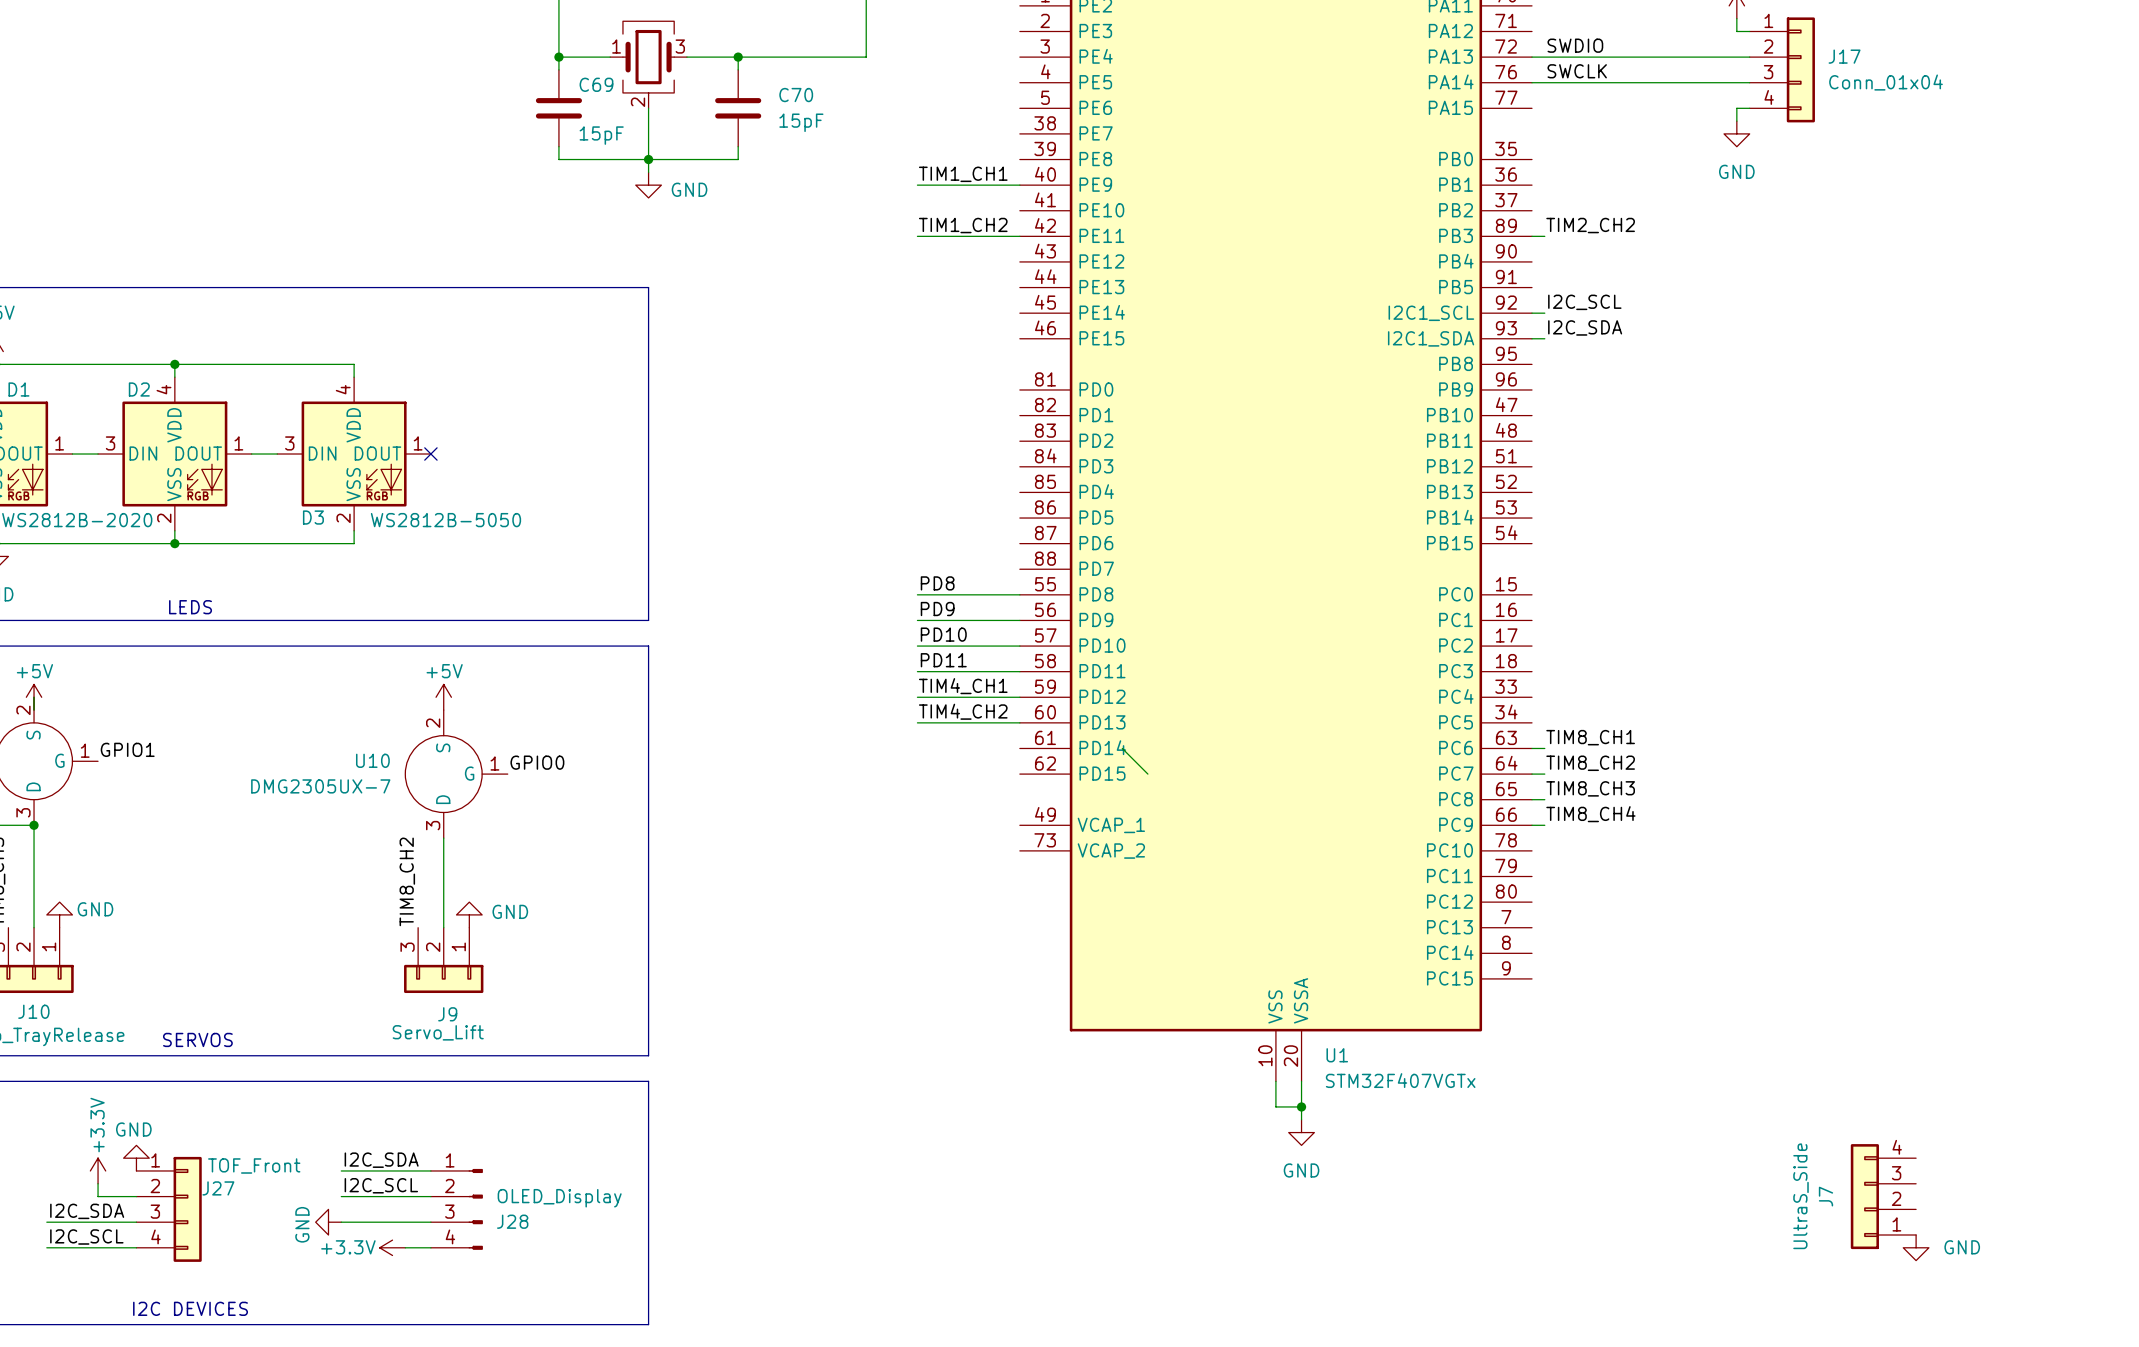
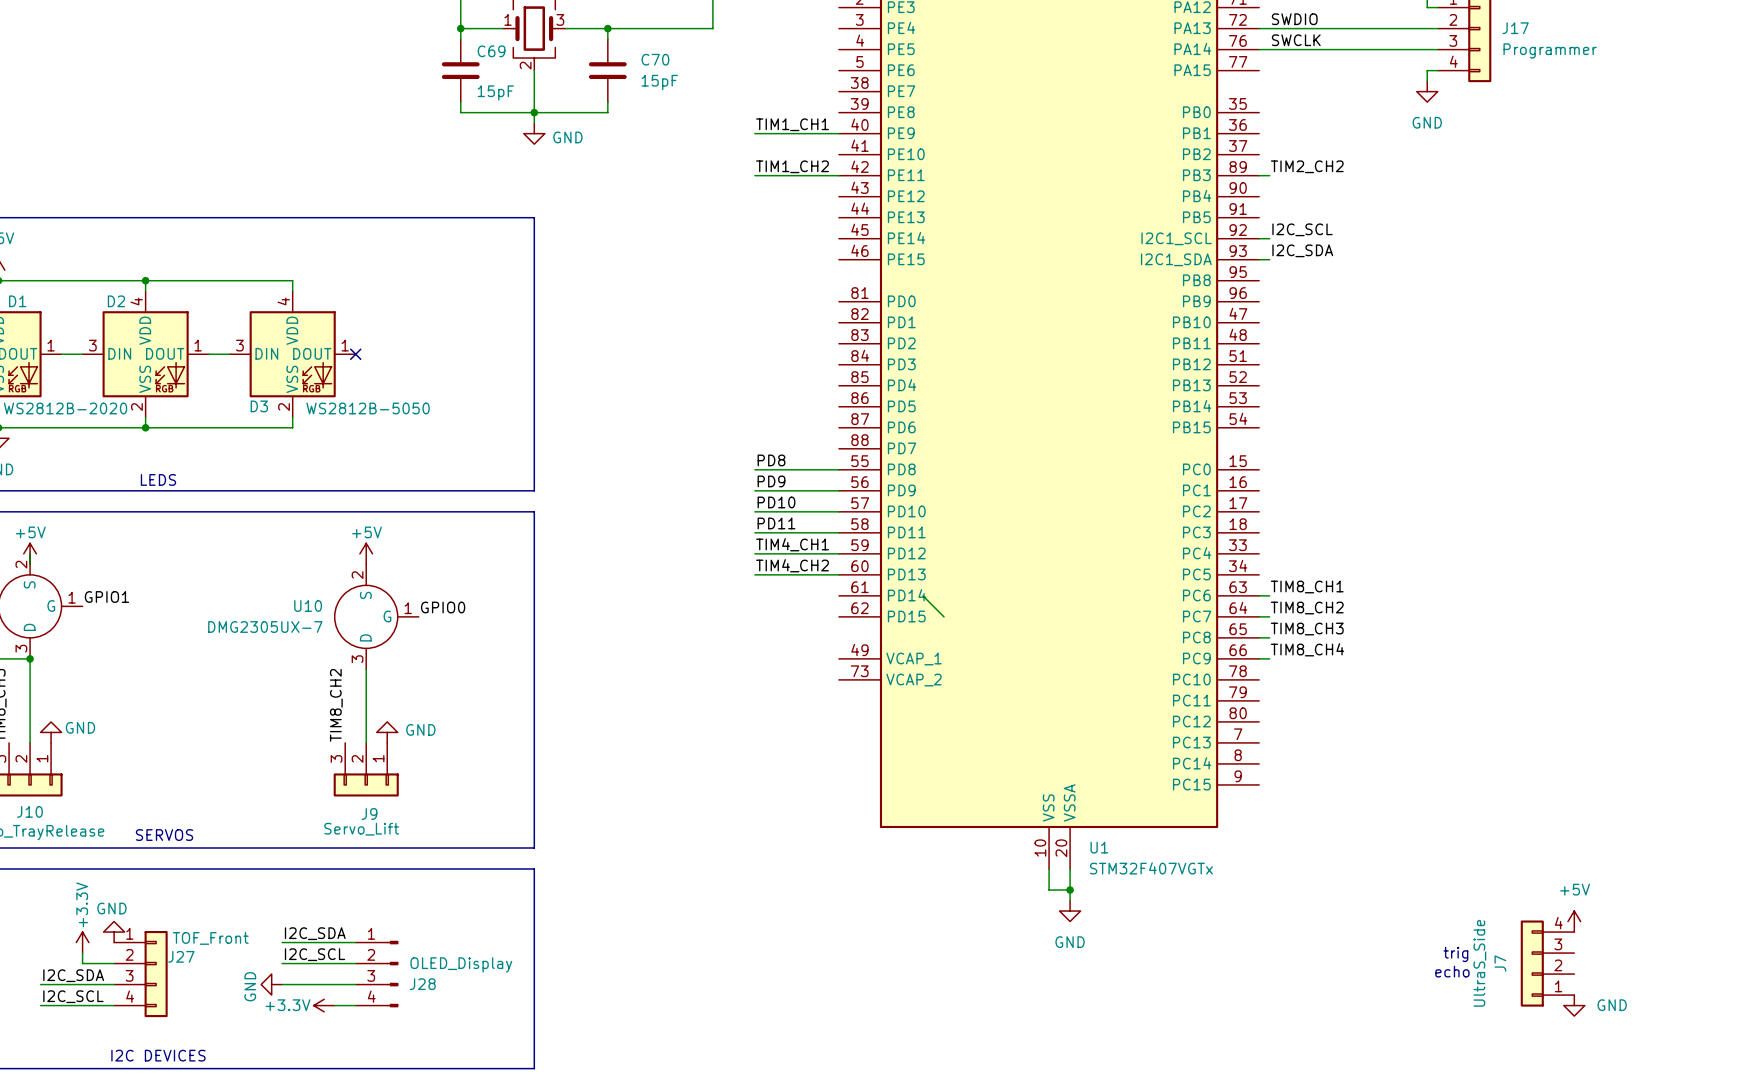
J17 value: Conn_01x04 (1886, 82) -> Programmer (1550, 50)
power symbol: none -> +5V (1574, 921)
text: none -> trig (1455, 954)
text: none -> echo (1452, 971)

